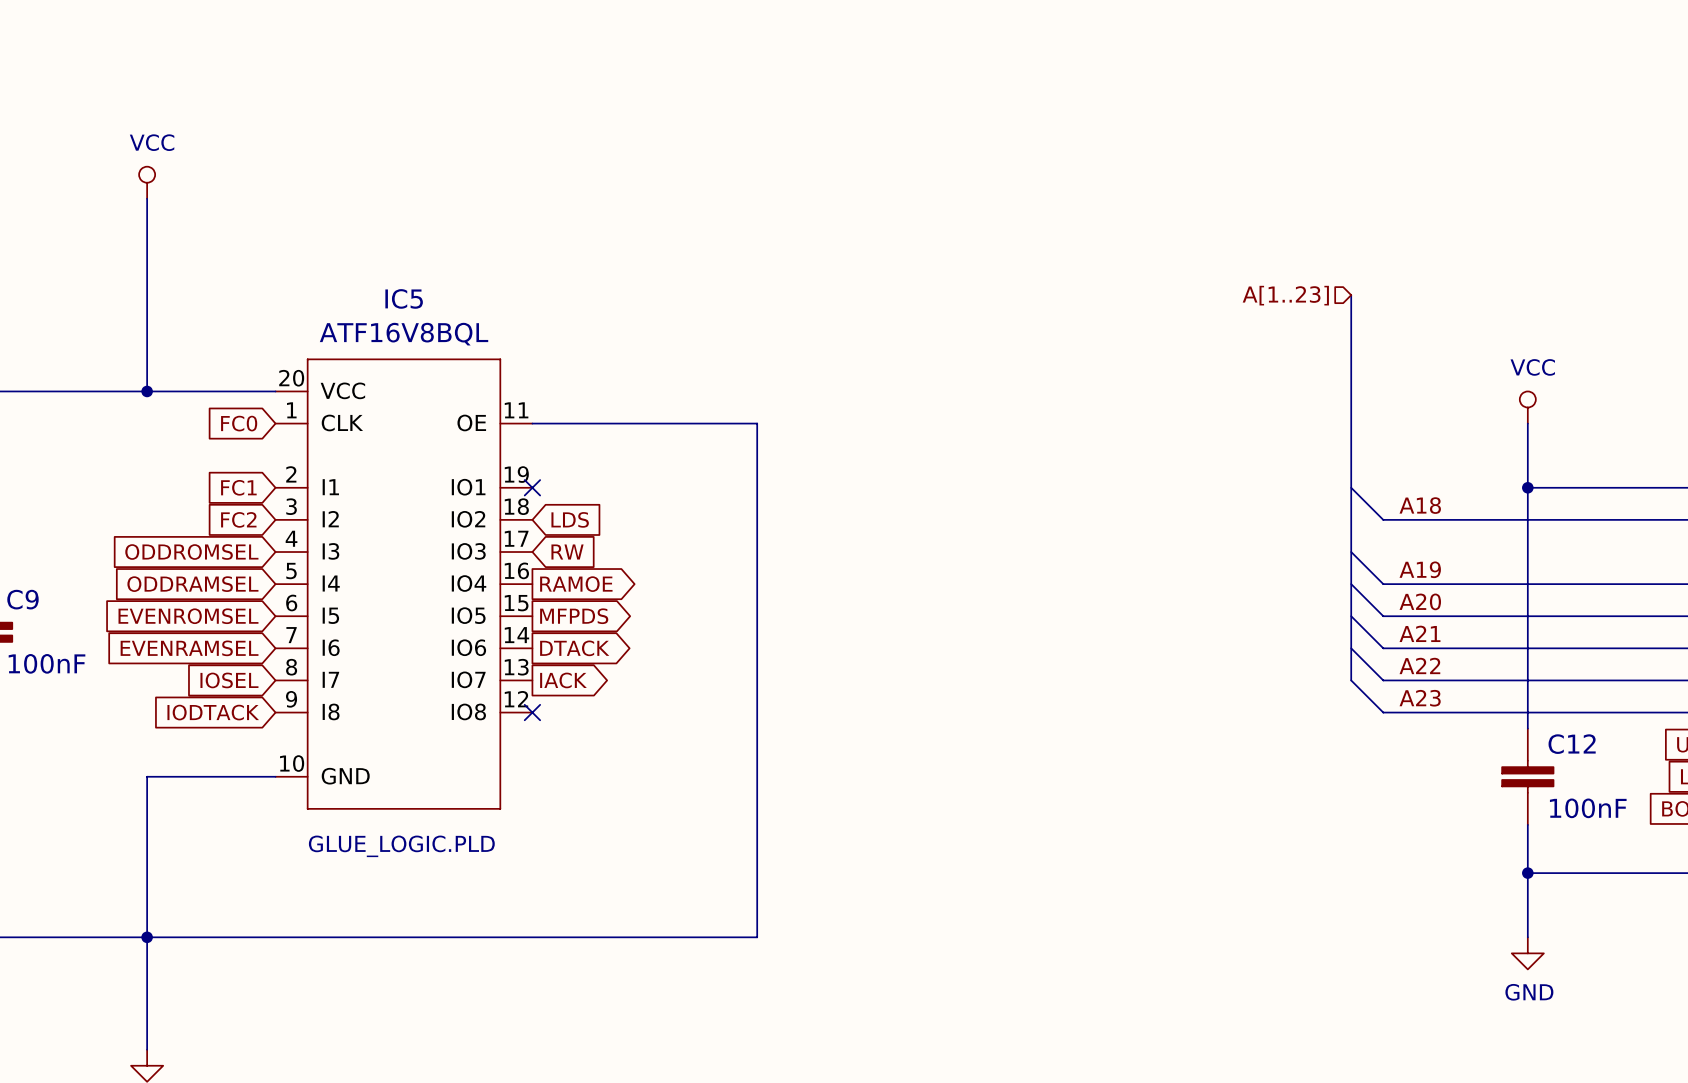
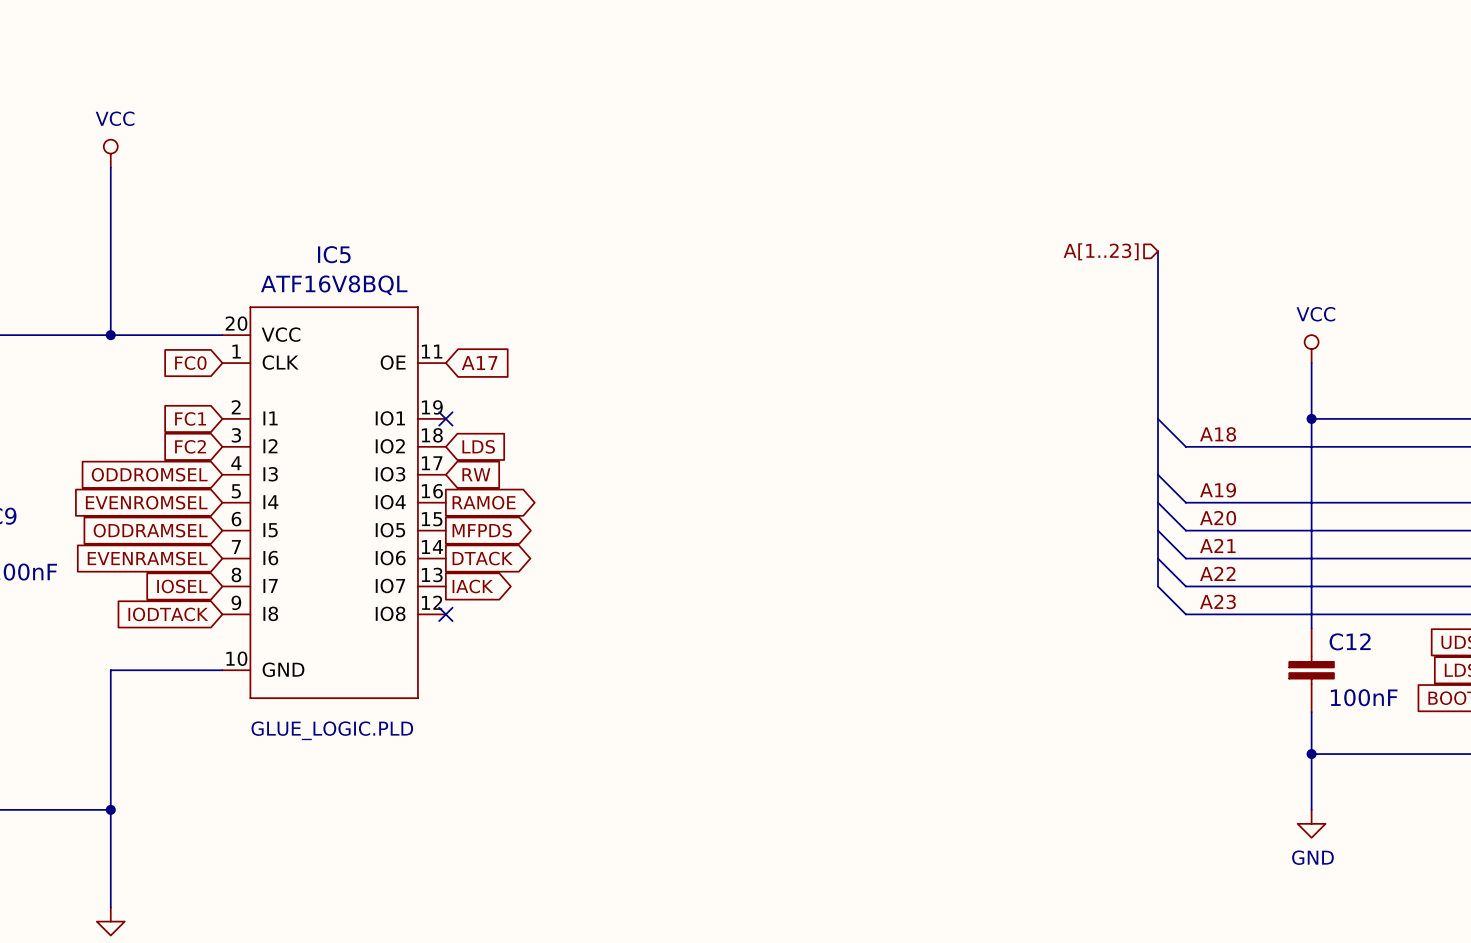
wire: (532, 423) (757, 423) (757, 937) (147, 937) -> none
global label: none -> A17 (479, 363)
global label: ODDRAMSEL (192, 584) -> EVENROMSEL (146, 502)
global label: EVENROMSEL (188, 616) -> ODDRAMSEL (150, 530)

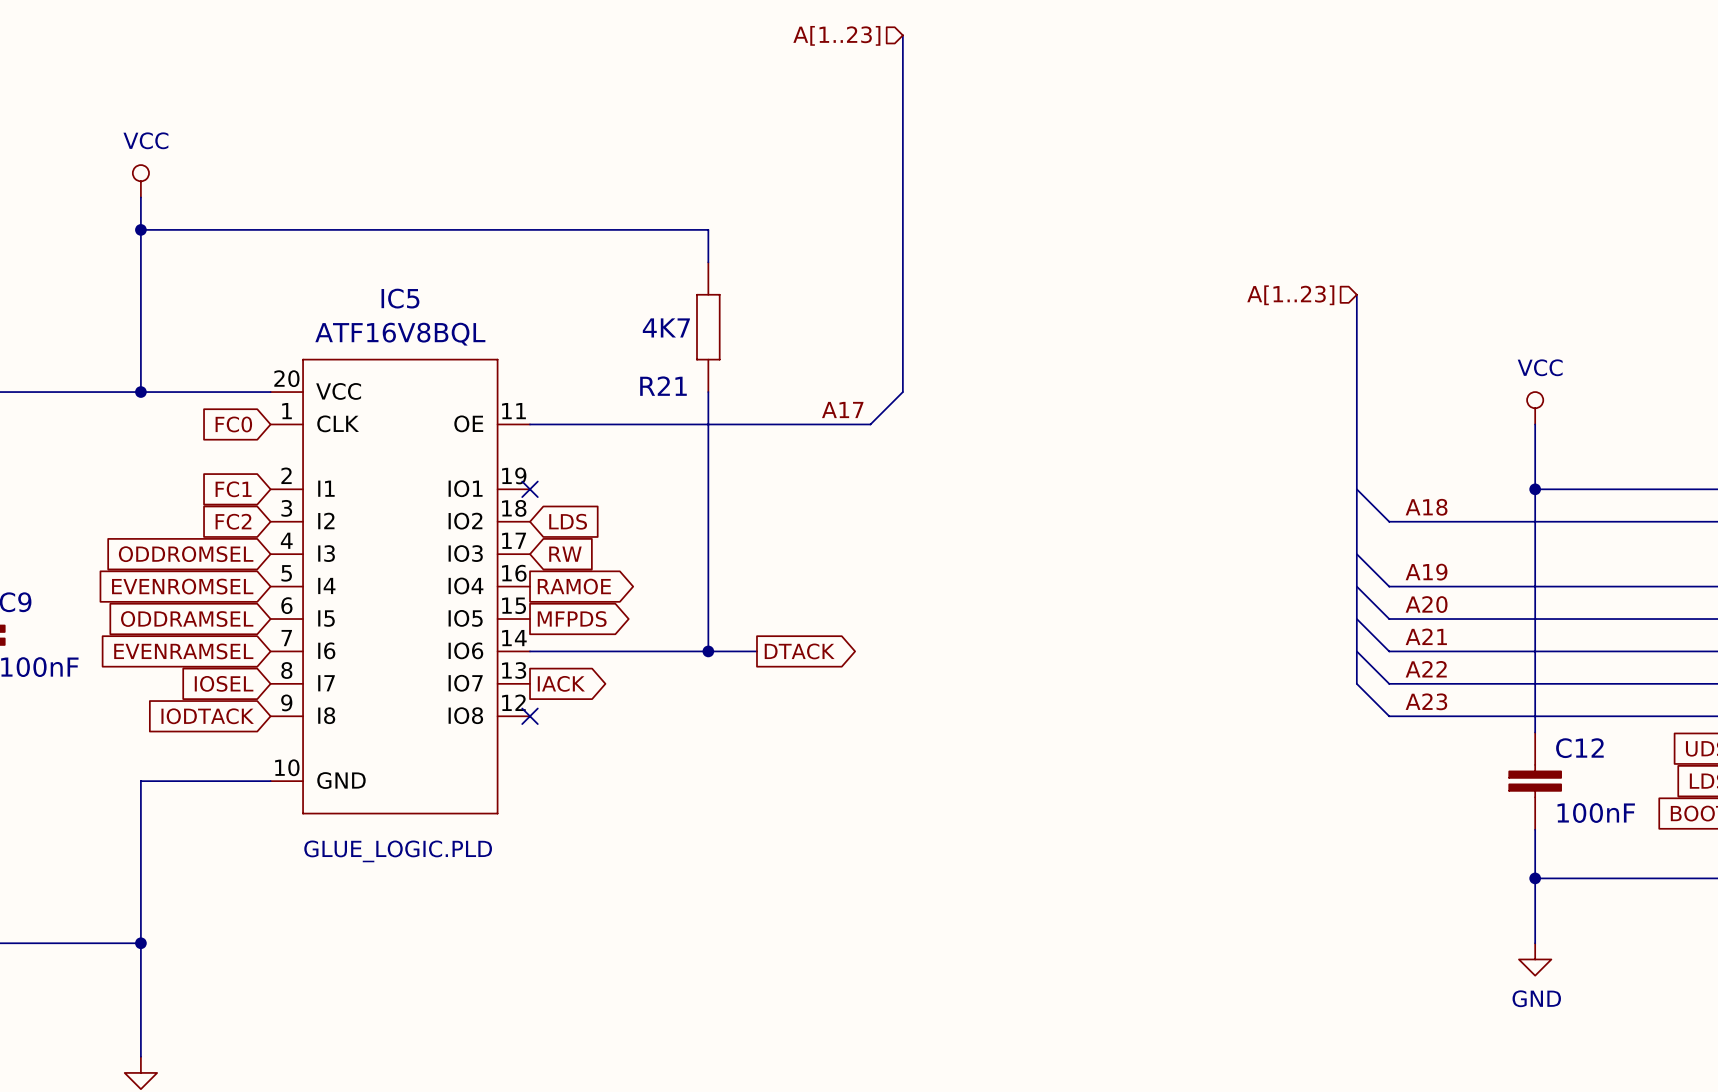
bus: none -> (902, 35) (902, 392)
hierarchical label: none -> A[1..23] (836, 35)
wire: none -> (140, 229) (708, 229) (708, 262)
junction: none -> (140, 229)
R21: none -> 4K7 (708, 327)
wire: none -> (708, 392) (708, 651)
wire: none -> (902, 392) (870, 424) (530, 424)
label: none -> A17 (842, 409)
global label: A17 (479, 363) -> none
wire: none -> (530, 651) (756, 651)
global label position: DTACK (482, 558) -> DTACK (799, 651)
junction: none -> (708, 651)

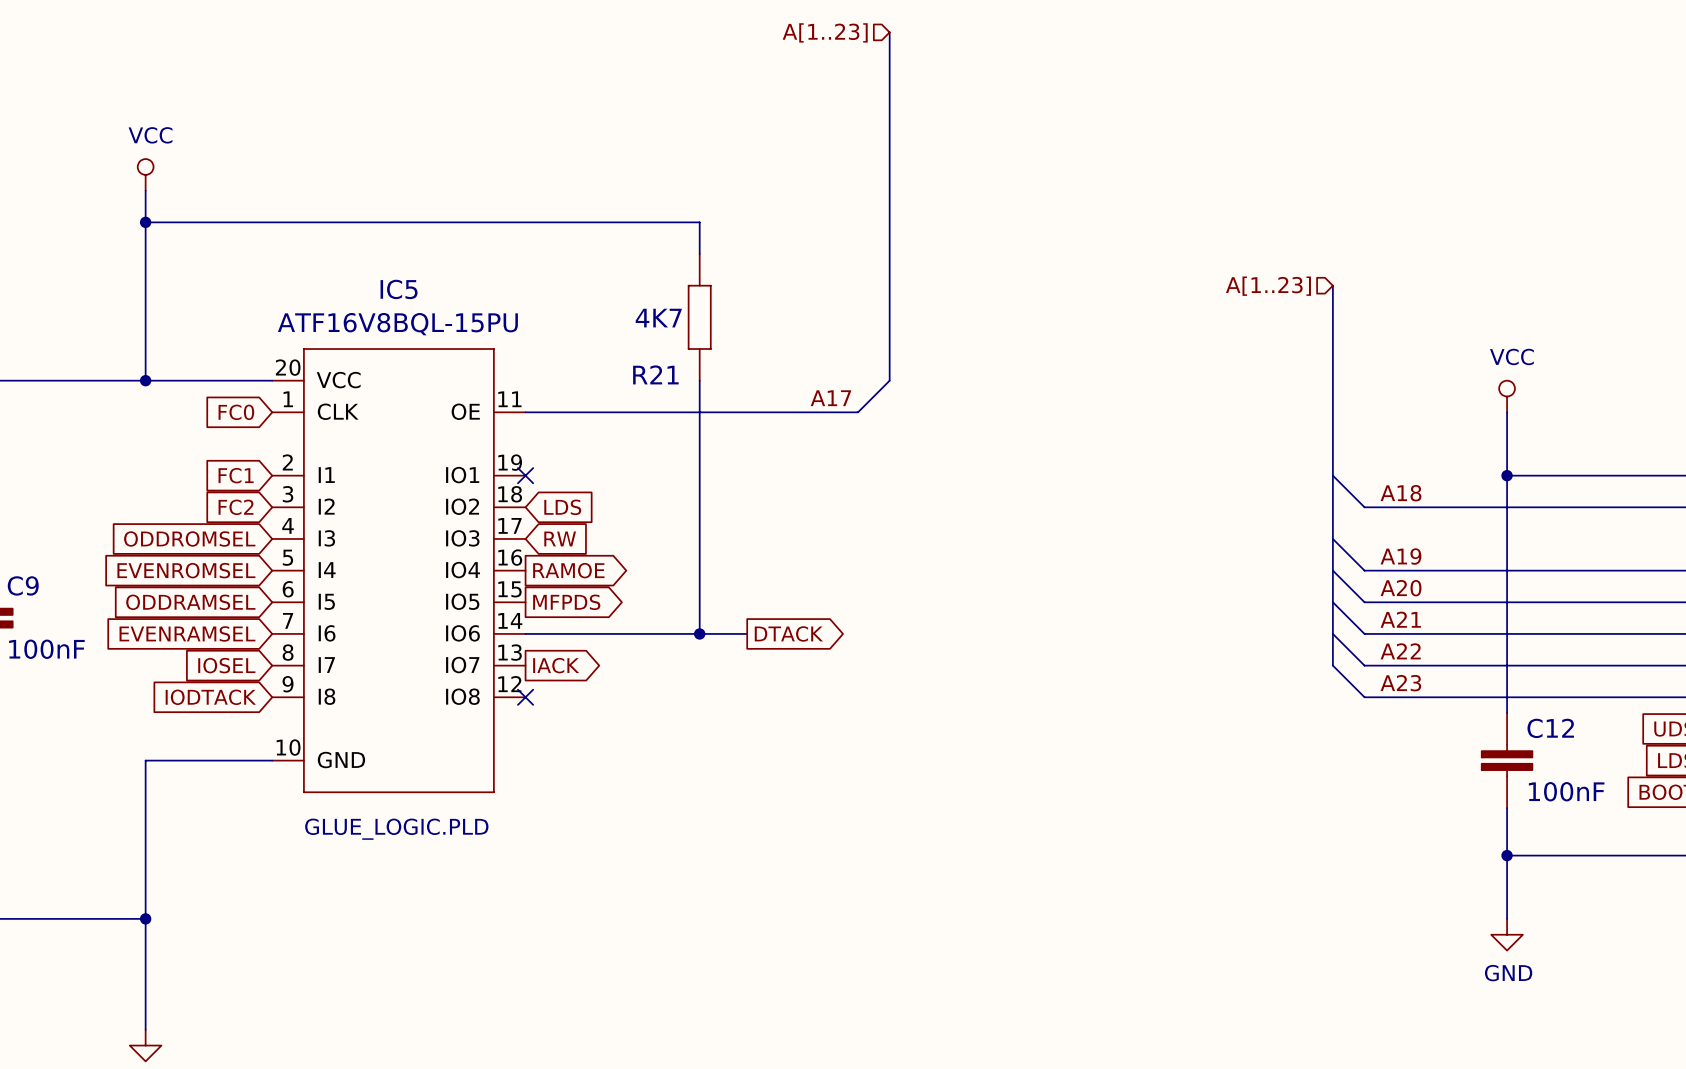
IC5 value: ATF16V8BQL (400, 334) -> ATF16V8BQL-15PU (397, 324)

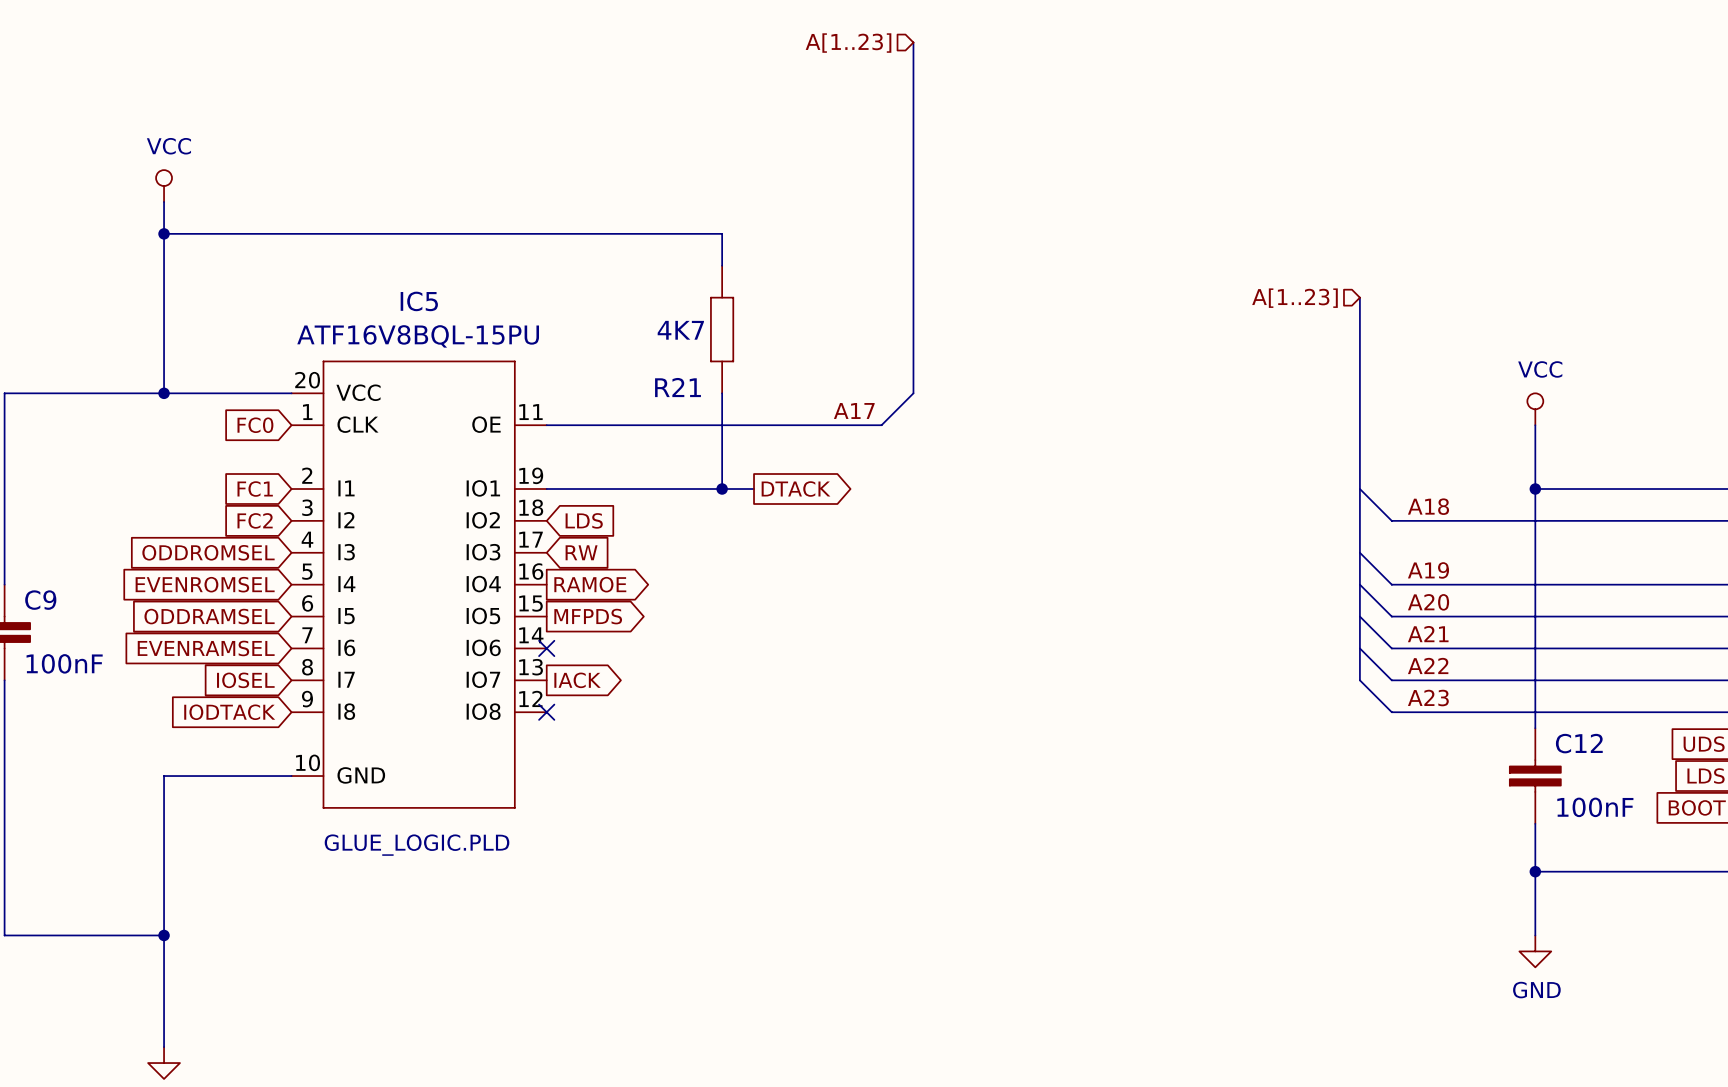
wire: none -> (546, 489) (754, 489)
no-connect mark: (525, 475) -> none
wire: (699, 475) (699, 633) -> none
junction: none -> (722, 489)
wire: (525, 633) (747, 633) -> none
no-connect mark: none -> (546, 648)
junction: (699, 633) -> none
global label position: DTACK (788, 633) -> DTACK (796, 489)

